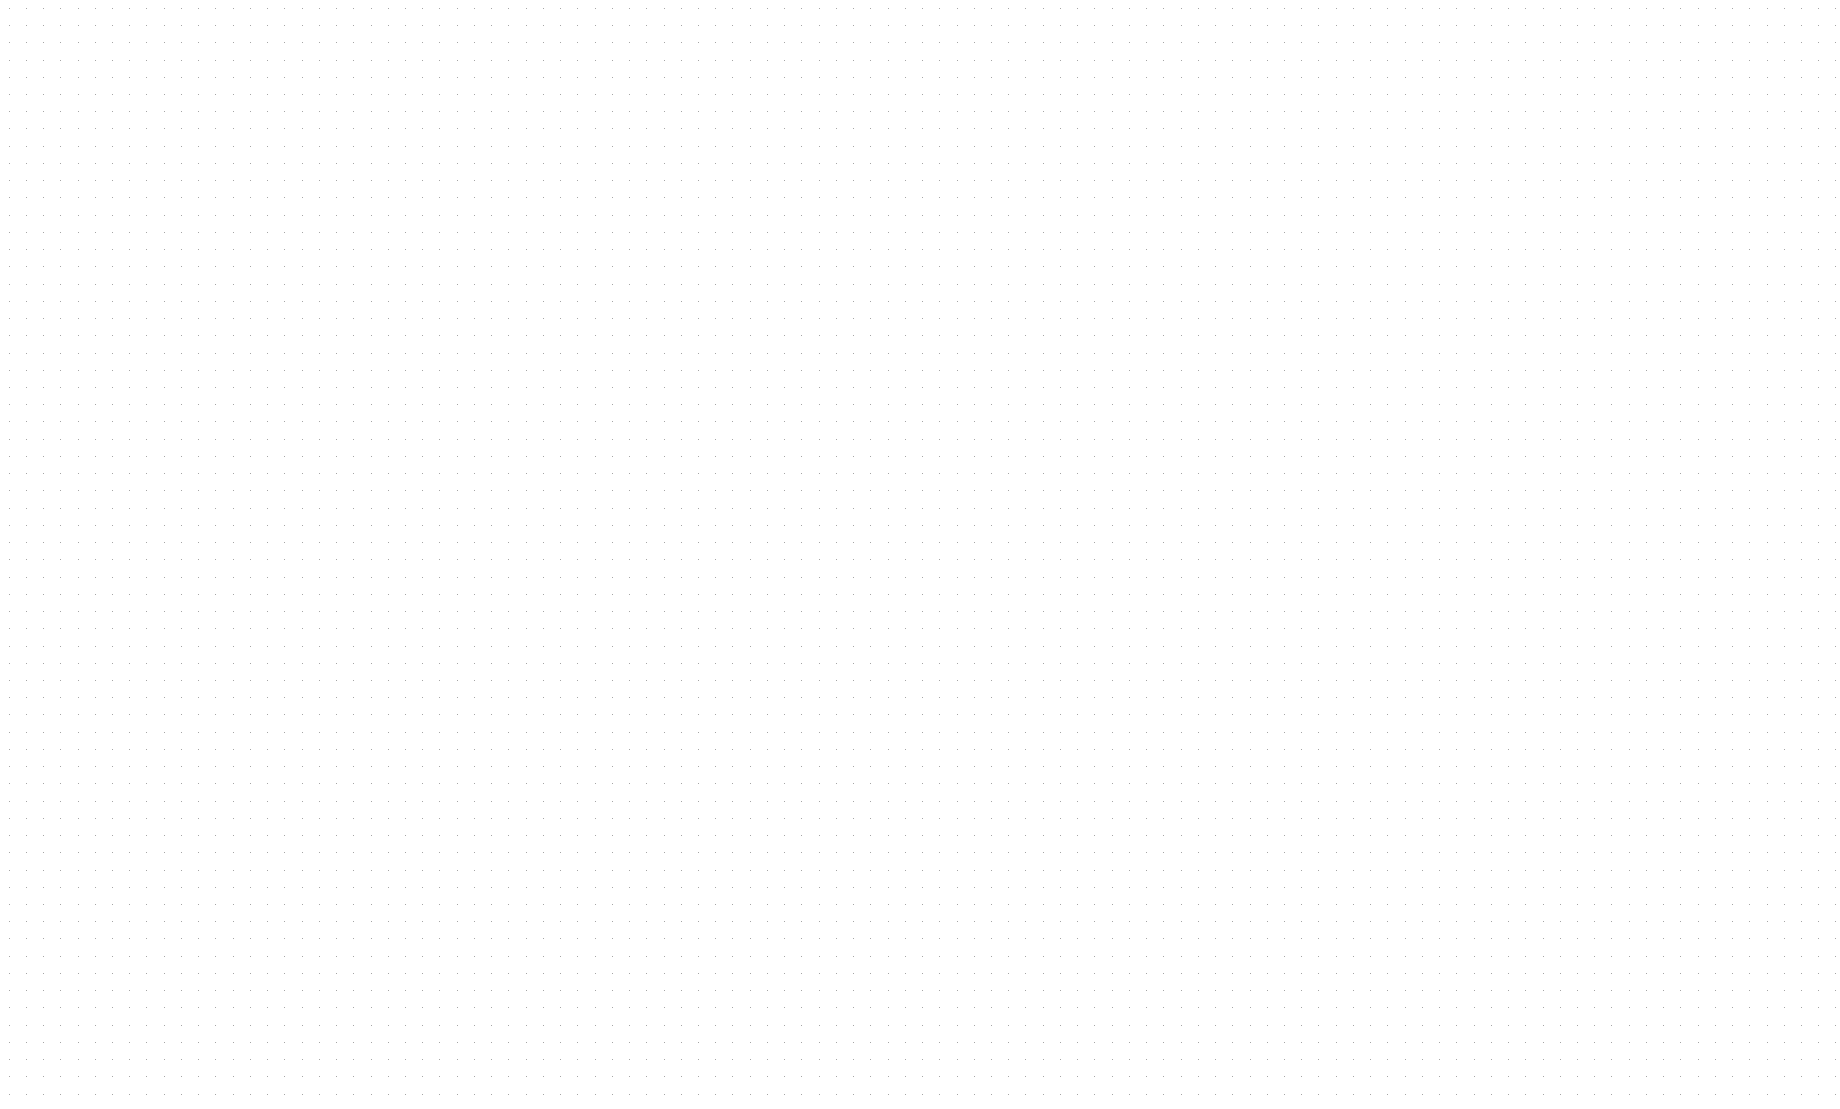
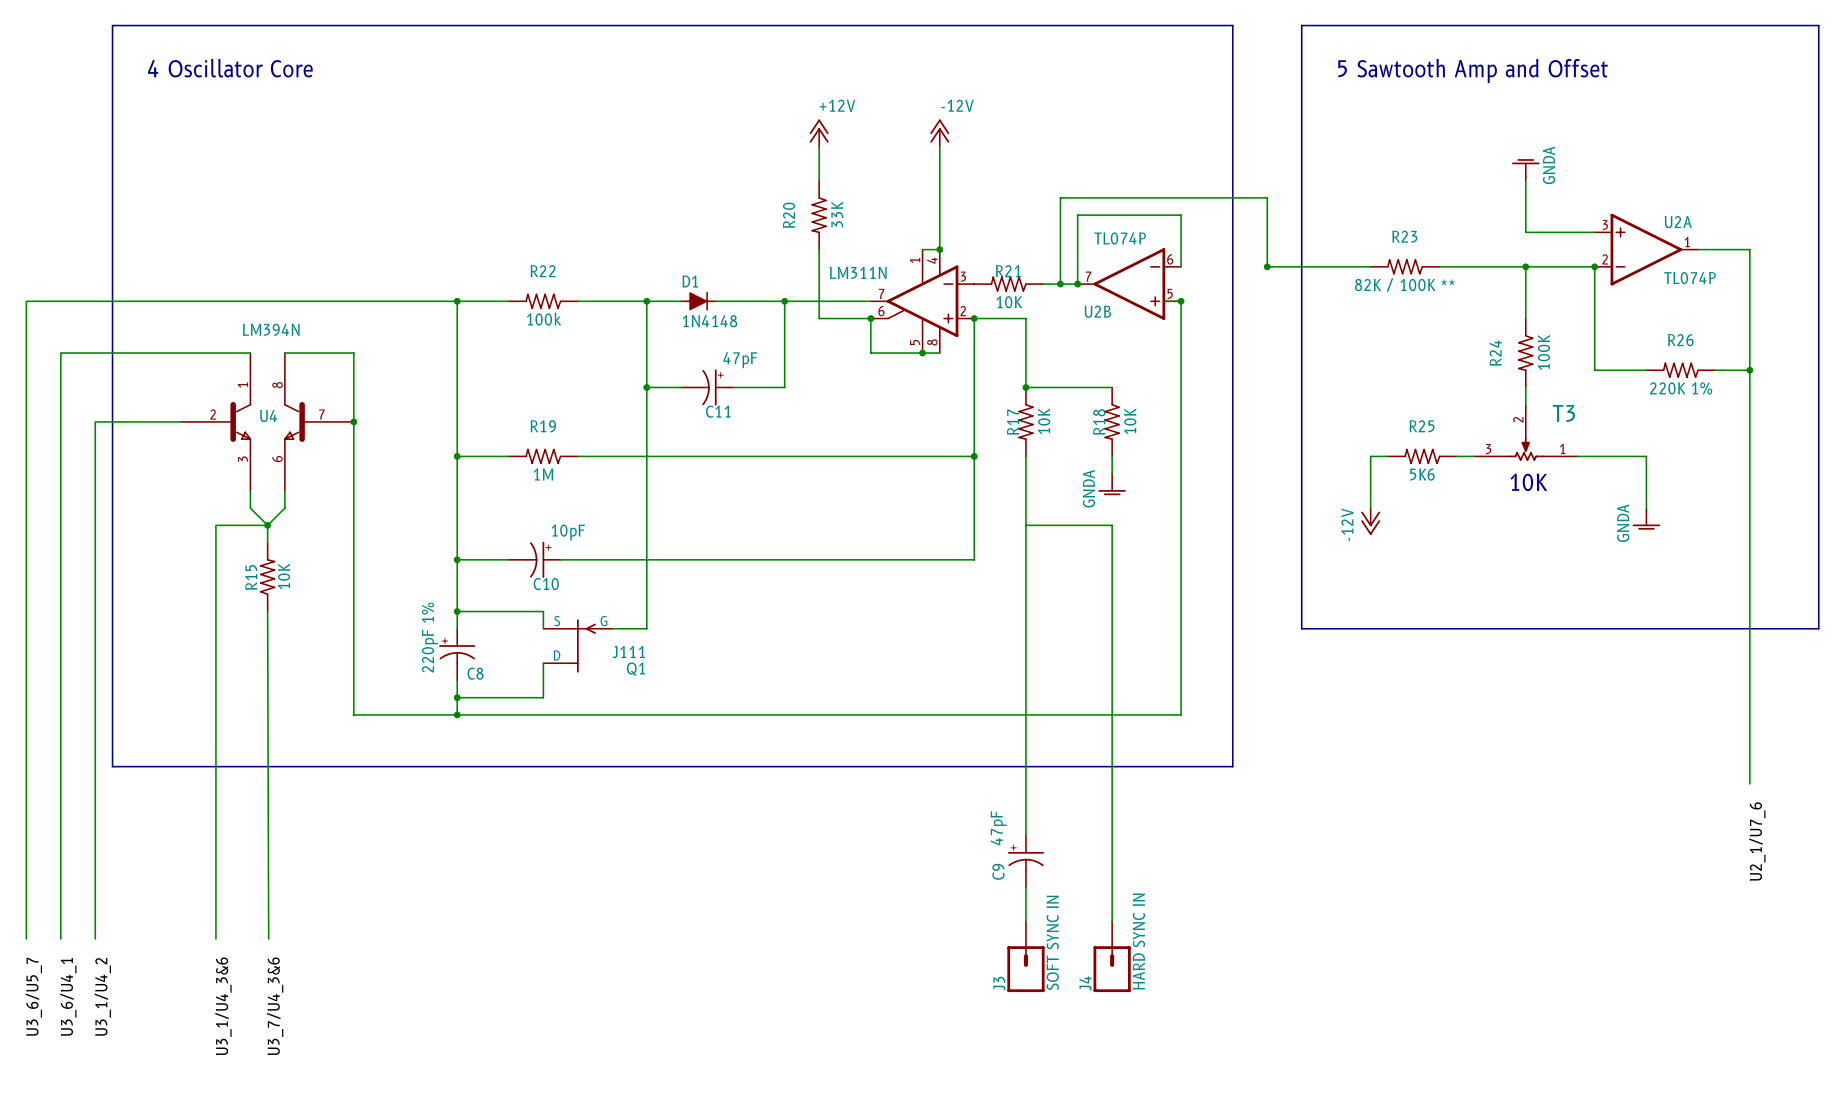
line: none -> (112, 25) (112, 766) (1232, 766) (1232, 25) (112, 25)
line: none -> (1301, 25) (1818, 25) (1818, 628) (1301, 628) (1301, 25)
text: none -> 4 Oscillator Core (230, 68)
text: none -> 5 Sawtooth Amp and Offset (1473, 70)
power symbol: none -> +12V (819, 132)
power symbol: none -> -12V (939, 132)
wire: none -> (819, 146) (819, 180)
wire: none -> (939, 146) (939, 249) (922, 249)
power symbol: none -> GNDA (1525, 169)
wire: none -> (1525, 180) (1525, 232) (1594, 232)
R20: none -> 33K (819, 215)
wire: none -> (819, 249) (819, 318) (870, 318) (870, 353) (939, 353)
junction: none -> (939, 249)
U2A: none -> TL074P (1646, 249)
wire: none -> (1698, 249) (1749, 249) (1749, 783)
wire: none -> (1181, 266) (1181, 215) (1077, 215) (1077, 284) (1043, 284)
junction: none -> (1267, 266)
wire: none -> (1370, 266) (1267, 266) (1267, 197) (1060, 197) (1060, 284)
R23: none -> 82K / 100K ** (1405, 266)
wire: none -> (1439, 266) (1594, 266) (1594, 370) (1646, 370)
wire: none -> (1525, 266) (1525, 318)
junction: none -> (1525, 266)
junction: none -> (1594, 266)
R21: none -> 10K (1008, 284)
junction: none -> (1060, 284)
junction: none -> (1077, 284)
U2B: none -> TL074P (1129, 284)
wire: none -> (26, 301) (26, 938)
wire: none -> (27, 301) (508, 301)
wire: none -> (457, 301) (457, 628)
junction: none -> (457, 301)
R22: none -> 100k (543, 301)
wire: none -> (577, 301) (681, 301)
wire: none -> (646, 301) (646, 628) (612, 628)
junction: none -> (646, 301)
D1: none -> 1N4148 (698, 301)
wire: none -> (715, 301) (870, 301)
wire: none -> (784, 301) (784, 387) (732, 387)
junction: none -> (784, 301)
part: none -> LM311N (922, 301)
wire: none -> (1163, 301) (1181, 301) (1181, 714) (353, 714) (353, 353) (284, 353)
junction: none -> (1181, 301)
junction: none -> (870, 318)
junction: none -> (974, 318)
wire: none -> (60, 353) (60, 938)
wire: none -> (61, 353) (250, 353)
junction: none -> (922, 353)
R24: none -> 100K (1525, 353)
R26: none -> 220K 1% (1680, 370)
wire: none -> (1715, 370) (1749, 370)
junction: none -> (1749, 370)
wire: none -> (646, 387) (681, 387)
junction: none -> (646, 387)
C11: none -> 47pF (707, 387)
junction: none -> (1025, 387)
wire: none -> (1112, 387) (1025, 387) (1025, 318) (974, 318) (974, 559) (560, 559)
wire: none -> (1525, 387) (1525, 404)
wire: none -> (95, 421) (95, 938)
wire: none -> (96, 421) (181, 421)
U4: none -> LM394N (267, 421)
junction: none -> (353, 421)
R17: none -> 10K (1025, 421)
R18: none -> 10K (1112, 421)
T3: none -> (1525, 432)
wire: none -> (457, 456) (508, 456)
junction: none -> (457, 456)
R19: none -> 1M (543, 456)
wire: none -> (577, 456) (974, 456)
junction: none -> (974, 456)
wire: none -> (1025, 456) (1025, 835)
wire: none -> (1112, 456) (1112, 473)
wire: none -> (1387, 456) (1370, 456) (1370, 508)
R25: none -> 5K6 (1422, 456)
wire: none -> (1456, 456) (1474, 456)
wire: none -> (1577, 456) (1646, 456) (1646, 508)
text: none -> 10K (1528, 482)
power symbol: none -> GNDA (1112, 484)
wire: none -> (250, 490) (250, 508) (267, 525)
wire: none -> (284, 490) (284, 508) (267, 525)
power symbol: none -> GNDA (1646, 518)
power symbol: none -> -12V (1370, 521)
wire: none -> (215, 525) (215, 938)
wire: none -> (216, 525) (267, 525)
wire: none -> (267, 525) (267, 542)
junction: none -> (267, 525)
wire: none -> (1025, 525) (1112, 525) (1112, 921)
wire: none -> (457, 559) (508, 559)
junction: none -> (457, 559)
C10: none -> 10pF (534, 559)
R15: none -> 10K (267, 577)
wire: none -> (267, 611) (268, 938)
wire: none -> (457, 611) (543, 611) (543, 628)
junction: none -> (457, 611)
Q1: none -> J111 (577, 646)
C8: none -> 220pF 1% (457, 654)
wire: none -> (543, 663) (543, 697) (457, 697)
wire: none -> (457, 680) (457, 714)
junction: none -> (457, 697)
junction: none -> (457, 714)
label: none -> U2_1/U7_6 (1757, 841)
C9: none -> 47pF (1025, 861)
wire: none -> (1025, 887) (1025, 921)
J3: none -> SOFT SYNC IN (1025, 956)
J4: none -> HARD SYNC IN (1112, 956)
label: none -> U3_6/U5_7 (33, 996)
label: none -> U3_6/U4_1 (68, 996)
label: none -> U3_1/U4_2 (102, 996)
label: none -> U3_1/U4_3&6 (223, 1006)
label: none -> U3_7/U4_3&6 (275, 1006)

